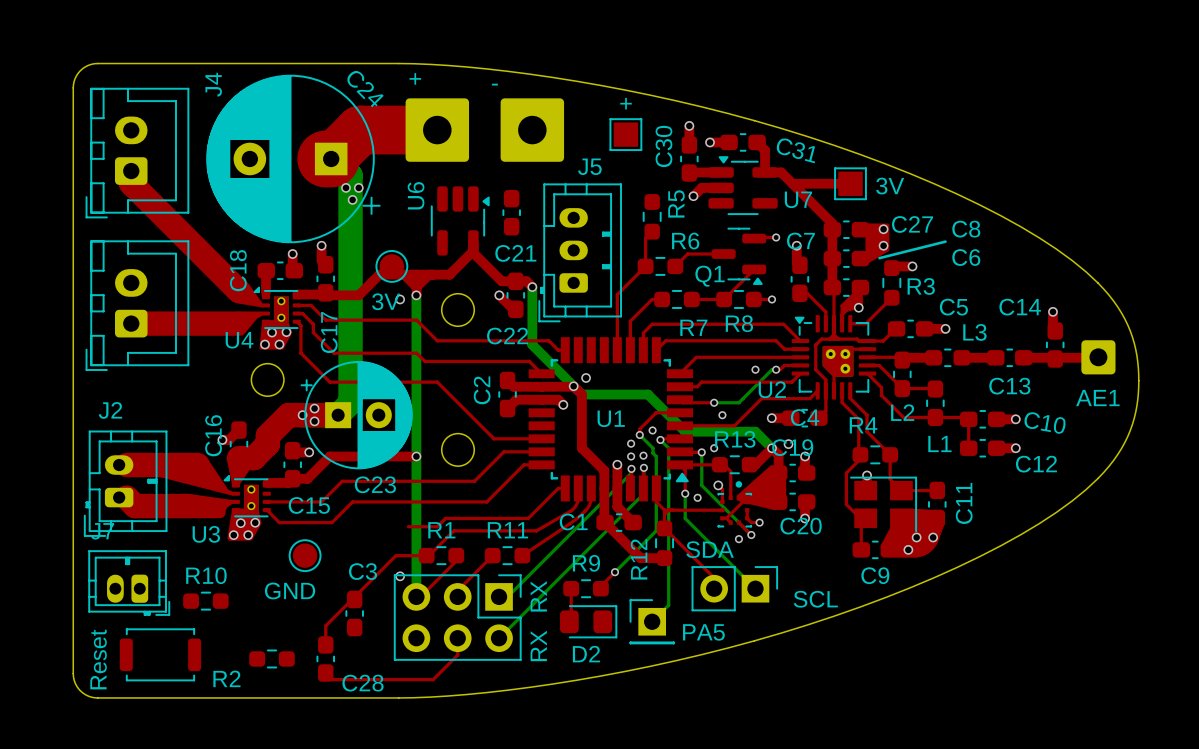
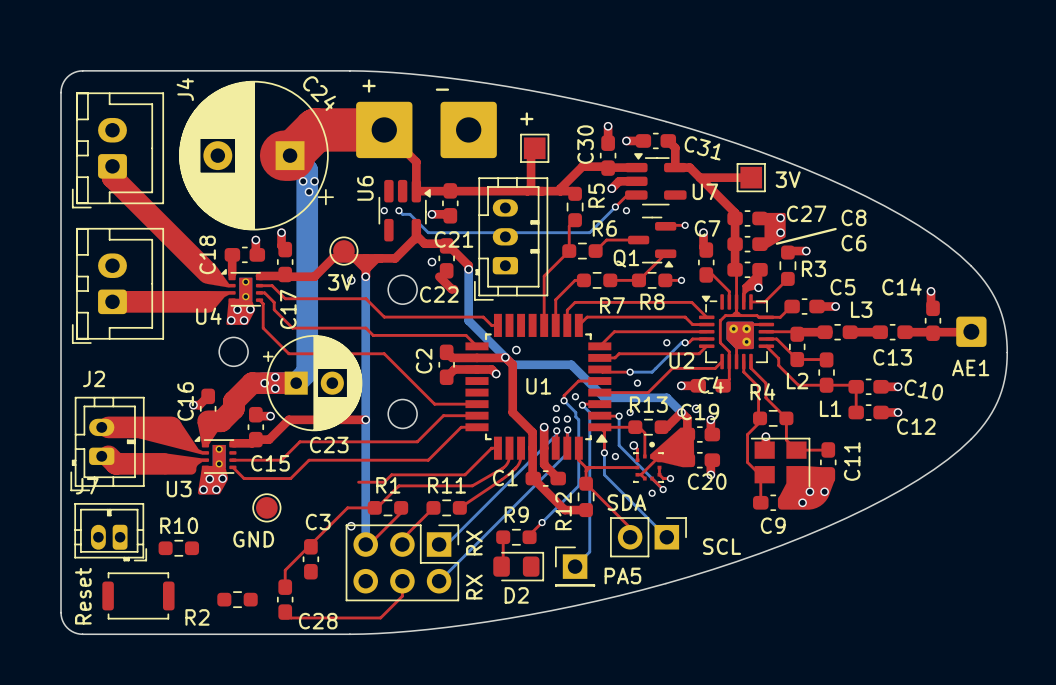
text position: + (626, 103) -> + (526, 119)
top track: none -> (384, 129) (416, 162) (416, 191) (572, 191)
part position: (625, 134) -> (534, 148)
top track: none -> (534, 148) (531, 151) (531, 187) (527, 191)
J5 name: J5 (589, 166) -> none
top track: none -> (608, 168) (582, 166) (560, 188) (560, 191)
top track: none -> (636, 195) (627, 195) (615, 207)
bottom track: none -> (615, 207) (589, 232) (509, 232) (505, 236) (501, 232) (428, 232) (409, 214) (402, 214) (398, 210)
via: none -> (615, 207)
via: none -> (384, 210)
via: none -> (398, 210)
via: none -> (626, 210)
top track: none -> (431, 214) (446, 215)
via: none -> (431, 214)
top track: (473, 252) (501, 281) (526, 281) (532, 287) -> (416, 235) (424, 243) (444, 243) (448, 245) (468, 265) (468, 269)
via position: (499, 295) -> (431, 262)
C22 position: (515, 295) -> (446, 258)

